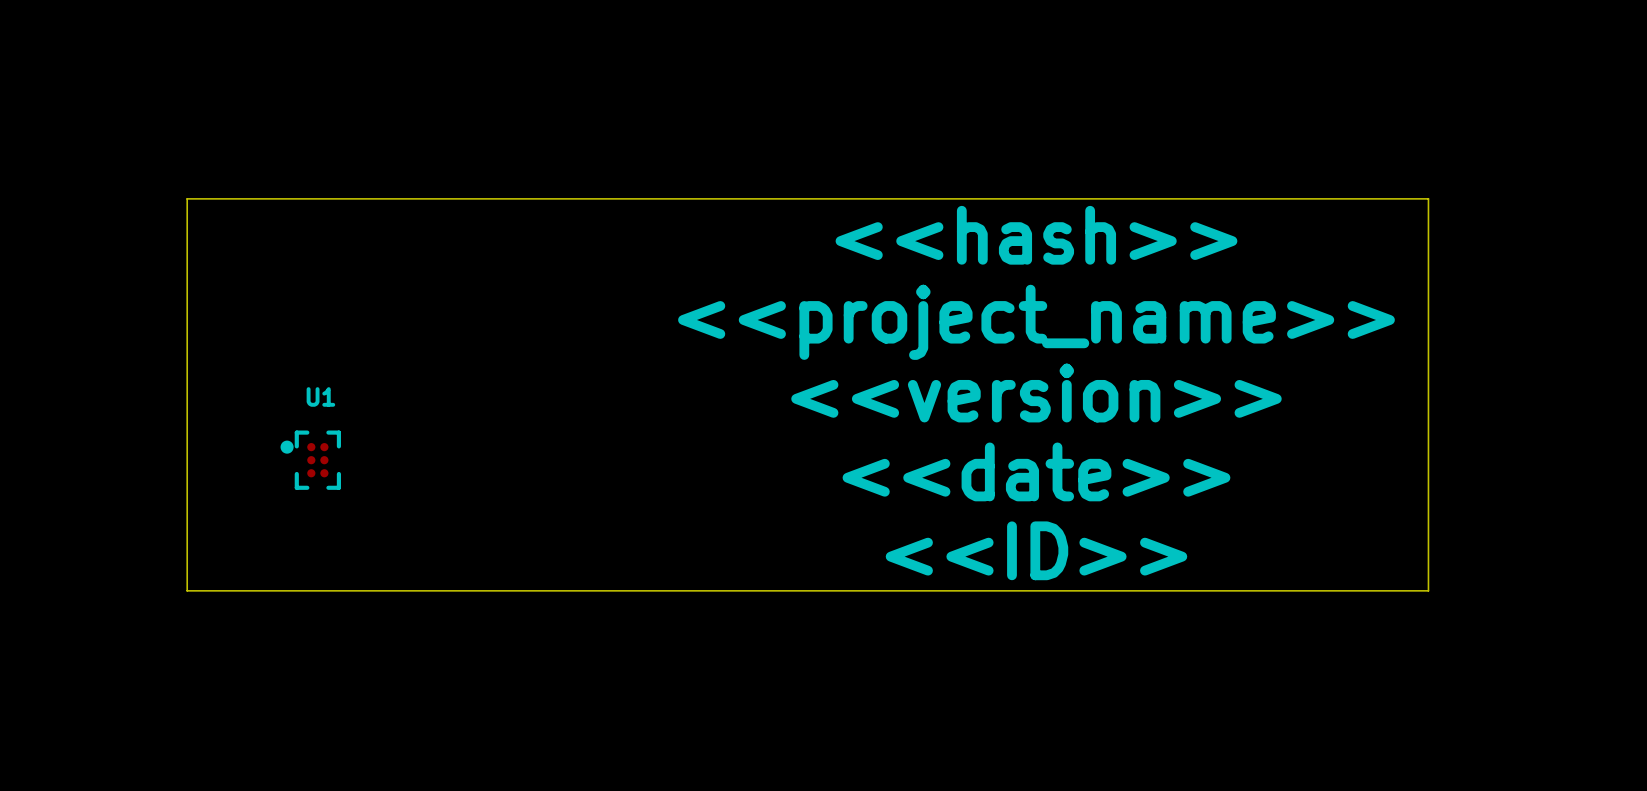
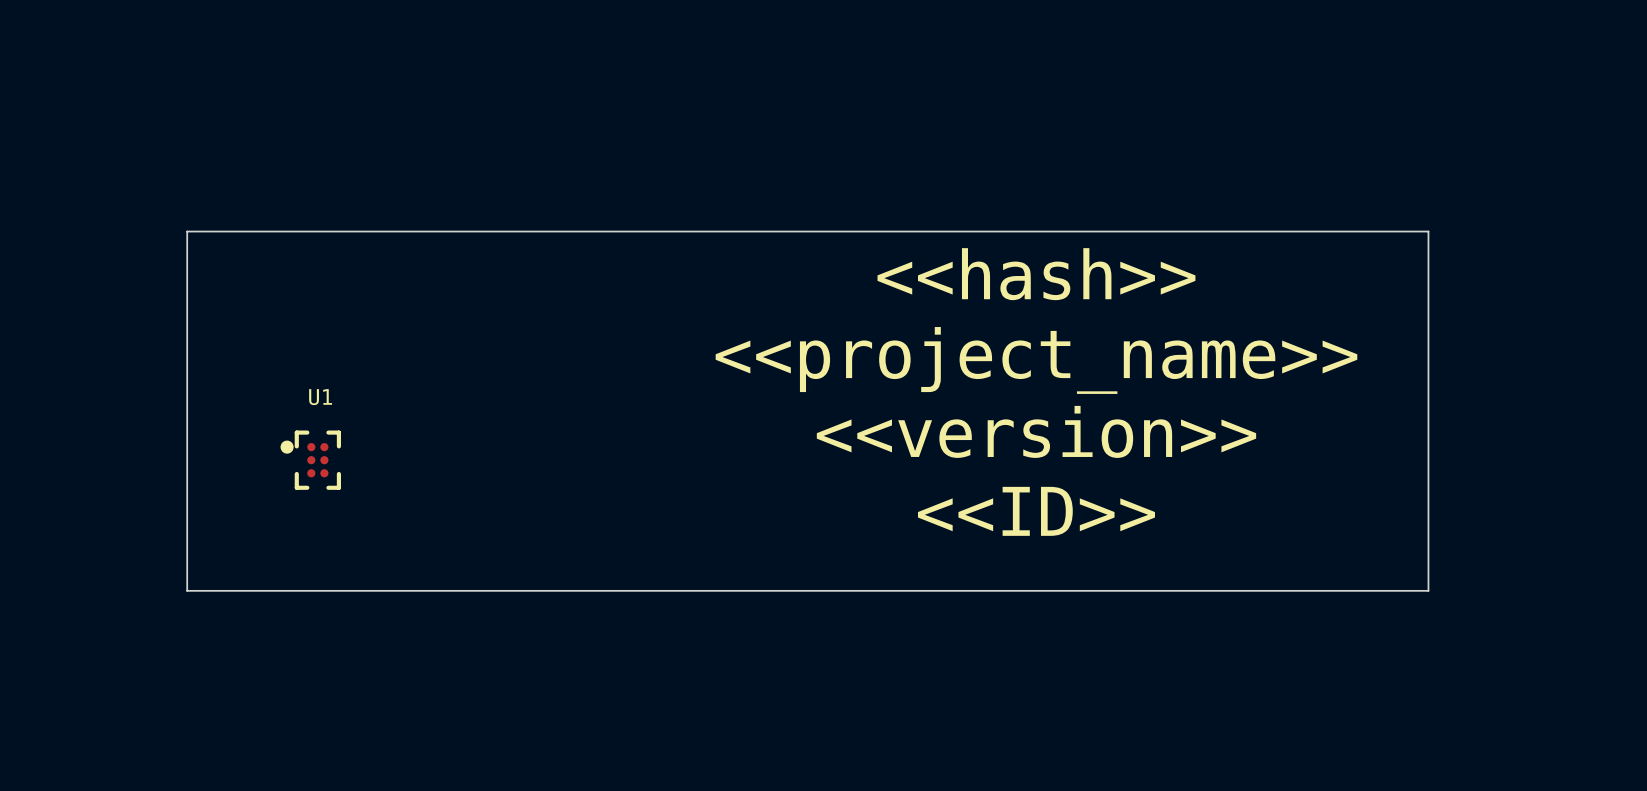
board edge: (187, 231) (187, 198) (1428, 198) (1428, 231) -> (187, 231) (1428, 231)
text position: <<hash>> (1036, 235) -> <<hash>> (1036, 274)
text position: <<project_name>> (1036, 322) -> <<project_name>> (1036, 360)
text position: <<version>> (1036, 393) -> <<version>> (1036, 431)
text: <<date>> (1036, 471) -> none
text position: <<ID>> (1036, 550) -> <<ID>> (1036, 511)

